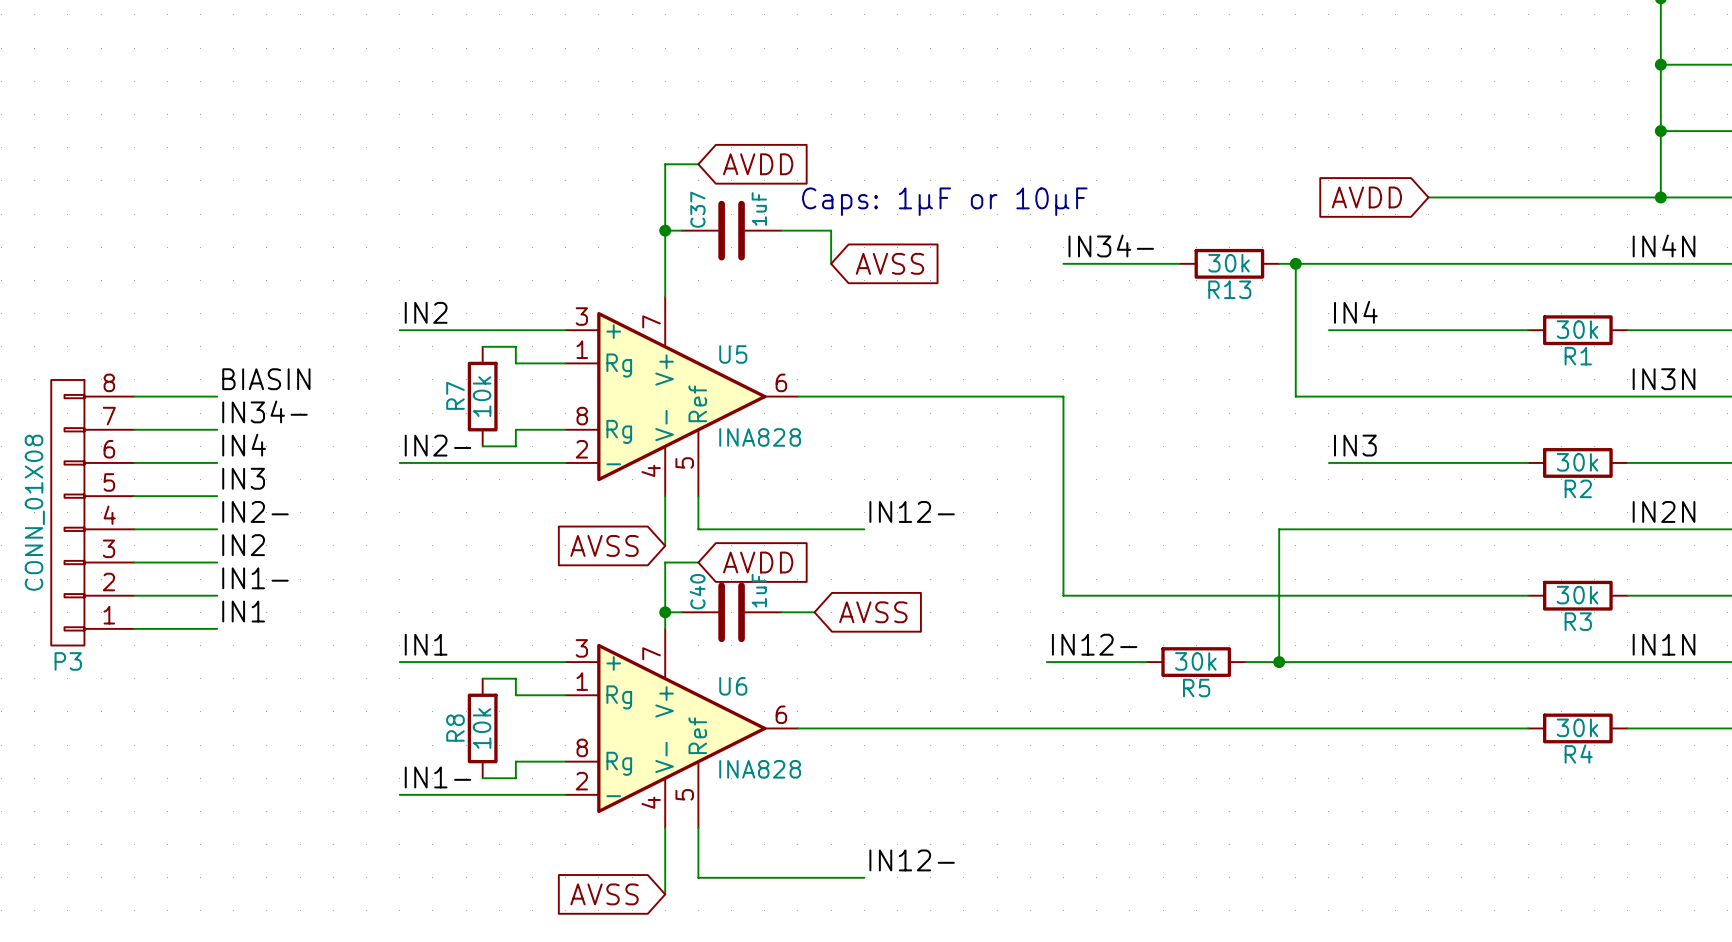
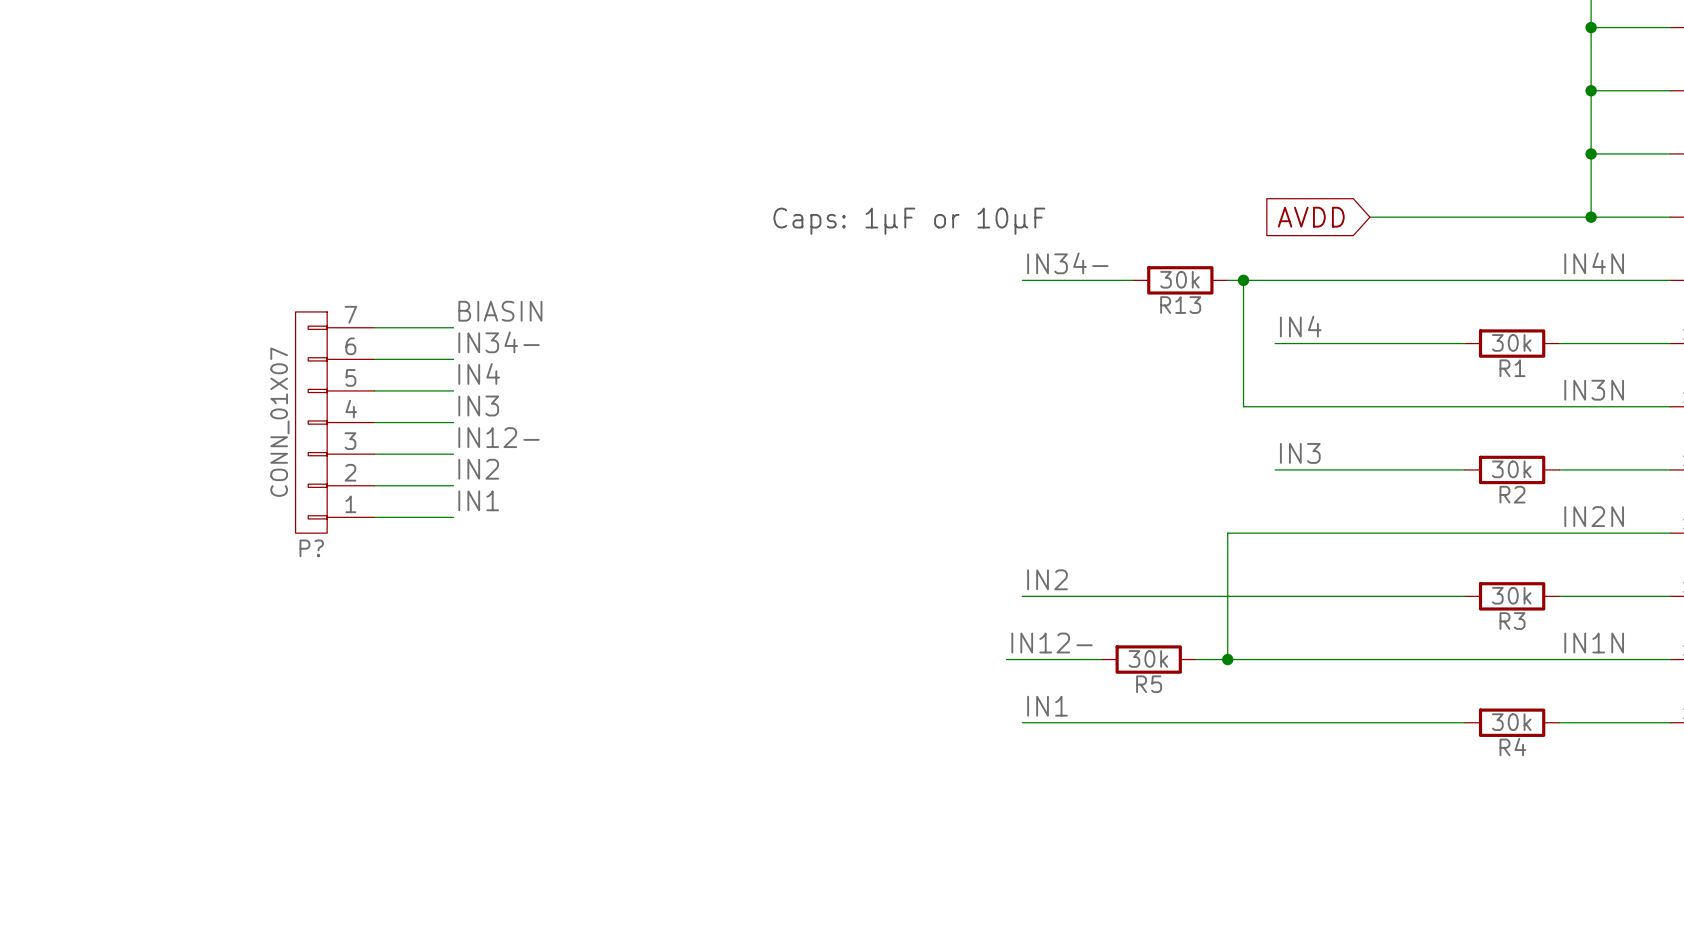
wire: (698, 164) (665, 164) (665, 297) -> none
global label: AVDD (758, 164) -> none
wire: (665, 230) (681, 230) -> none
junction: (665, 230) -> none
C37: 1uF (731, 230) -> none
wire: (781, 230) (831, 230) (831, 263) -> none
global label: AVSS (889, 263) -> none
label: IN2 (426, 312) -> none
wire: (399, 330) (565, 330) -> none
wire: (482, 346) (515, 346) (515, 363) (565, 363) -> none
label position: BIASIN (266, 379) -> BIASIN (500, 311)
wire: (134, 396) (217, 396) -> (374, 327) (453, 327)
R7: 10k (482, 396) -> none
U5: INA828 (681, 396) -> none
wire: (797, 396) (1063, 396) (1063, 595) -> none
label position: IN34- (264, 411) -> IN34- (499, 342)
P?: none -> CONN_01X07 (335, 422)
label: none -> IN12- (499, 437)
wire: (134, 429) (217, 429) -> (374, 359) (453, 359)
wire: (565, 429) (515, 429) (515, 446) (482, 446) -> none
label position: IN4 (244, 445) -> IN4 (479, 373)
label: IN2- (438, 445) -> none
wire: (134, 462) (217, 462) -> (374, 390) (453, 390)
wire: (399, 462) (565, 462) -> none
label: none -> IN2 (478, 469)
label position: IN3 (243, 478) -> IN3 (478, 406)
label: none -> IN1 (478, 500)
wire: (134, 496) (217, 496) -> (374, 422) (453, 422)
wire: (665, 496) (665, 545) -> none
wire: (698, 496) (698, 529) (864, 529) -> none
label: IN2- (255, 511) -> none
label: IN12- (912, 511) -> none
P3: CONN_01X08 (92, 512) -> none
wire: (134, 529) (217, 529) -> (374, 454) (453, 454)
label: IN2 (243, 545) -> none
global label: AVSS (604, 545) -> none
wire: (134, 562) (217, 562) -> (374, 485) (453, 485)
wire: (698, 562) (665, 562) (665, 628) -> none
global label: AVDD (758, 562) -> none
label: IN1- (255, 578) -> none
label: none -> IN2 (1047, 579)
wire: (134, 595) (217, 595) -> (374, 517) (453, 517)
label: IN1 (243, 611) -> none
wire: (665, 612) (681, 612) -> none
junction: (665, 612) -> none
C40: 1uF (731, 612) -> none
wire: (781, 612) (814, 612) -> none
global label: AVSS (873, 612) -> none
wire: (134, 628) (217, 628) -> none
label: IN1 (426, 644) -> none
wire: (399, 662) (565, 662) -> none
wire: (482, 678) (515, 678) (515, 695) (565, 695) -> none
label: none -> IN1 (1047, 706)
R8: 10k (482, 728) -> none
U6: INA828 (681, 728) -> none
wire: (797, 728) (1063, 728) -> none
wire: (565, 761) (515, 761) (515, 778) (482, 778) -> none
label: IN1- (438, 777) -> none
wire: (399, 794) (565, 794) -> none
wire: (665, 828) (665, 894) -> none
wire: (698, 828) (698, 877) (864, 877) -> none
label: IN12- (912, 860) -> none
global label: AVSS (604, 894) -> none

